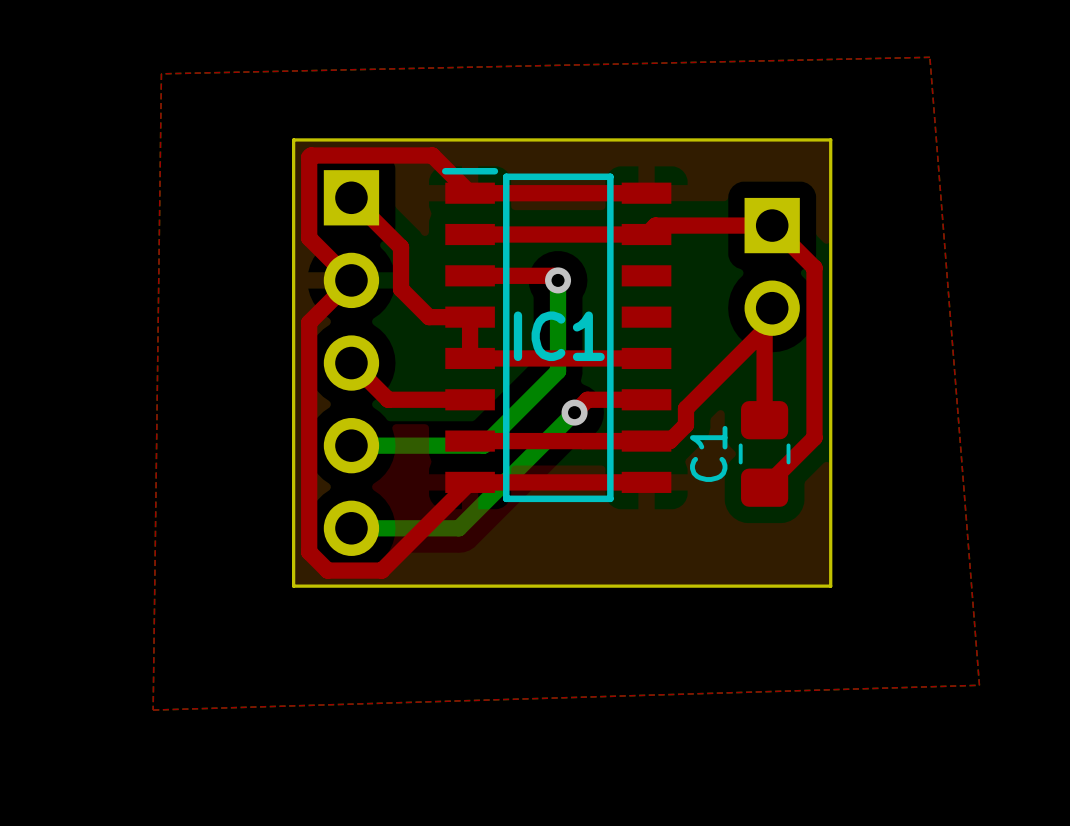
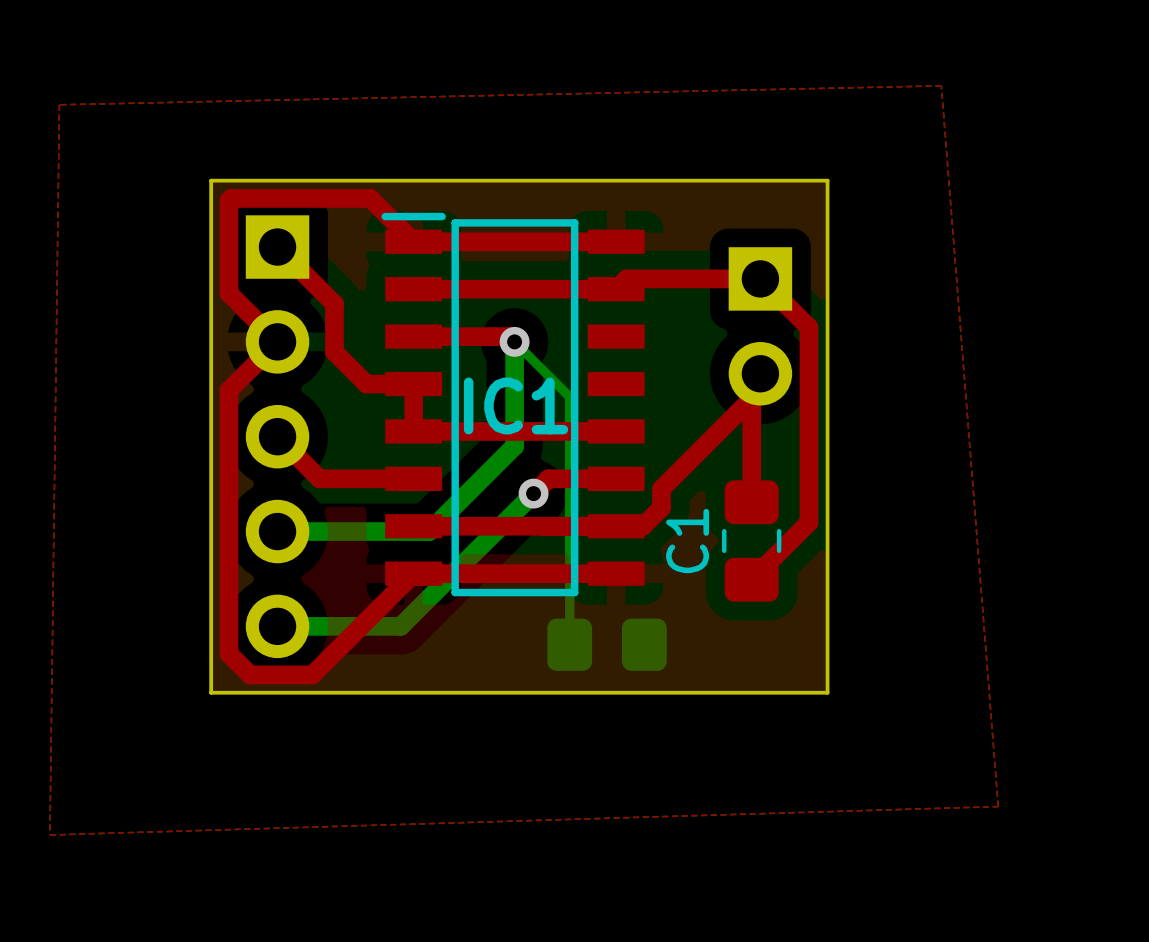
bottom track: none -> (514, 341) (569, 396) (569, 644)
part: none -> (607, 644)

